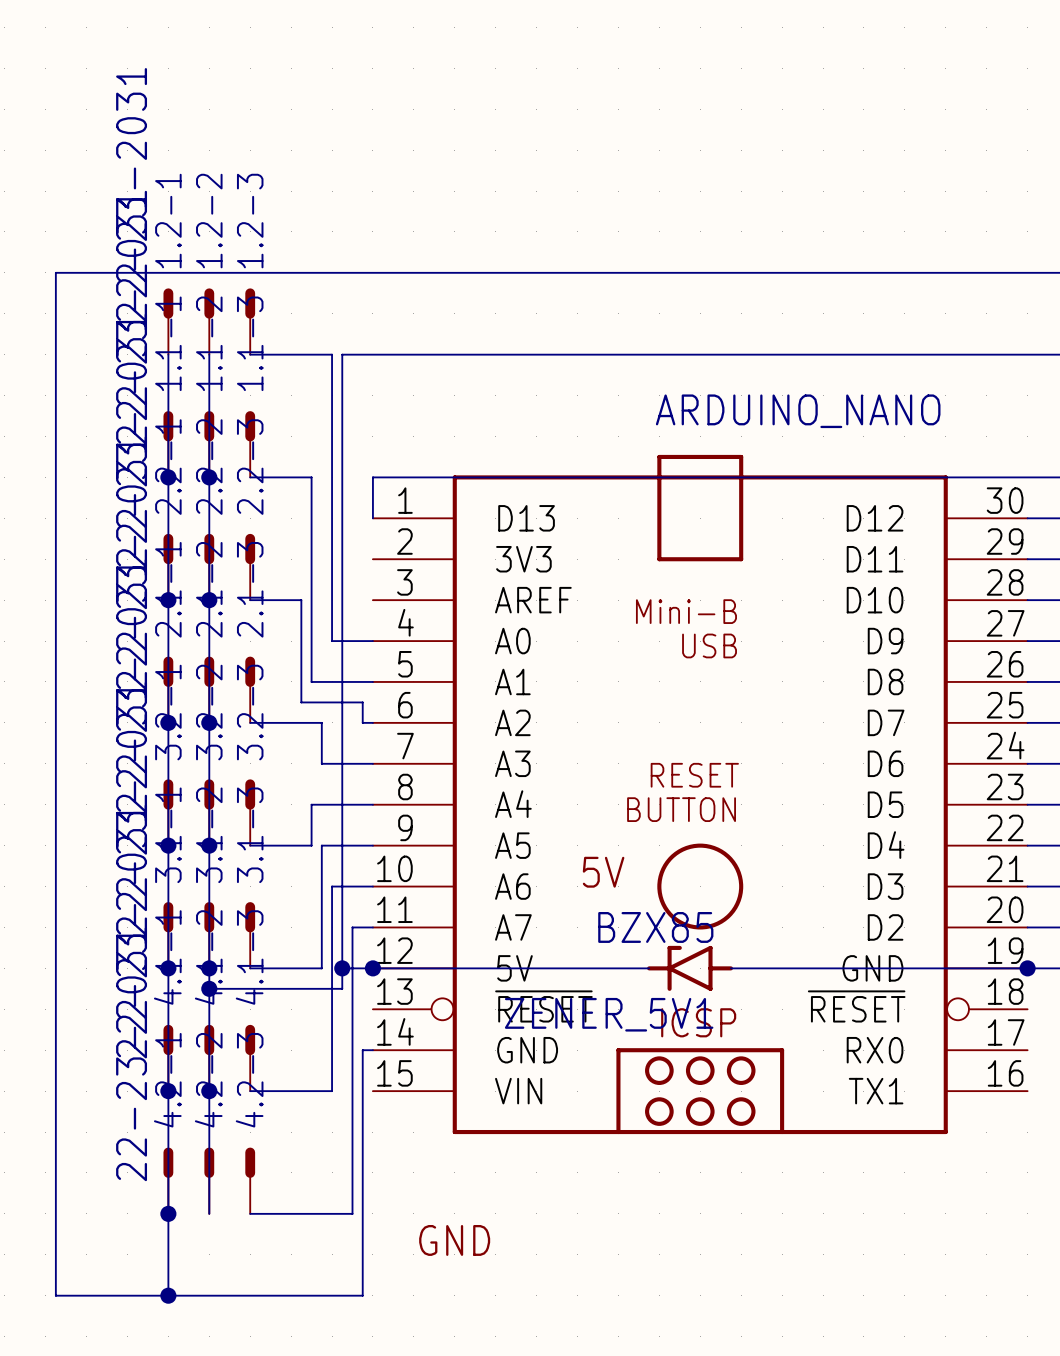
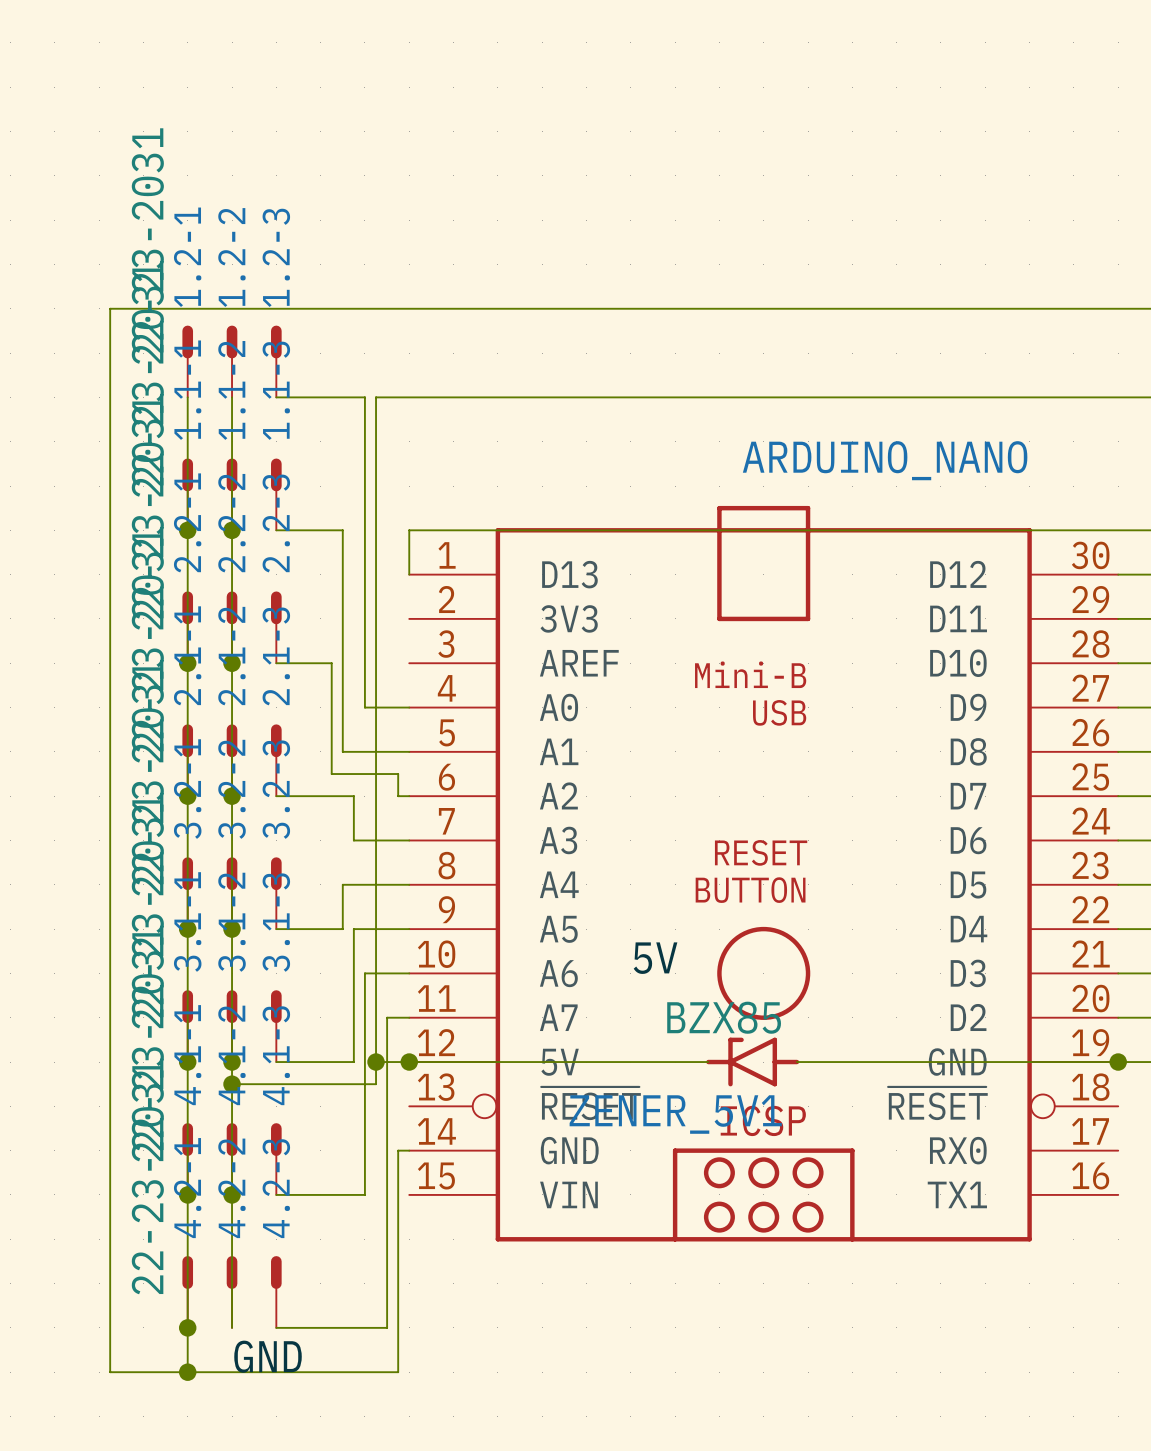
wire: (96, 272) (55, 272) (55, 1295) (362, 1295) (362, 1254) -> (110, 308) (110, 1372) (398, 1372)
label position: GND (454, 1240) -> GND (268, 1356)
wire: (168, 1254) (168, 1295) -> none
junction position: (168, 1295) -> (187, 1372)

